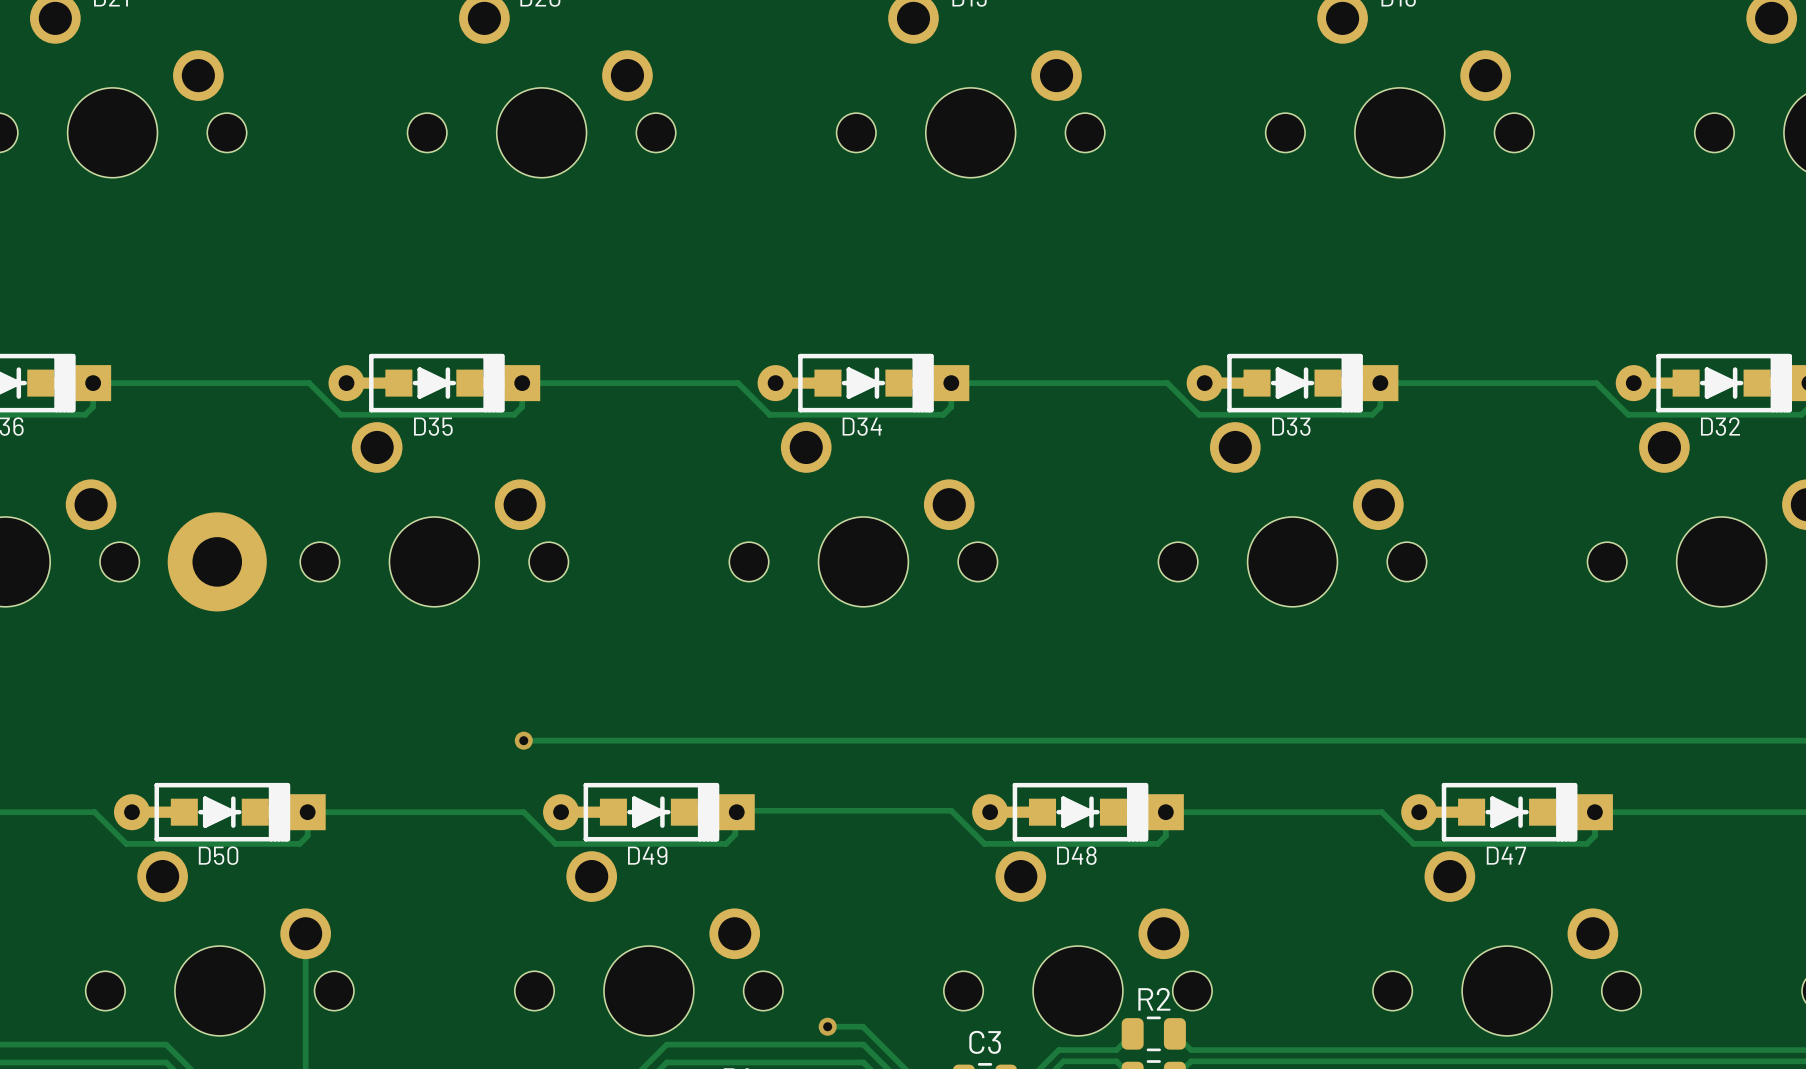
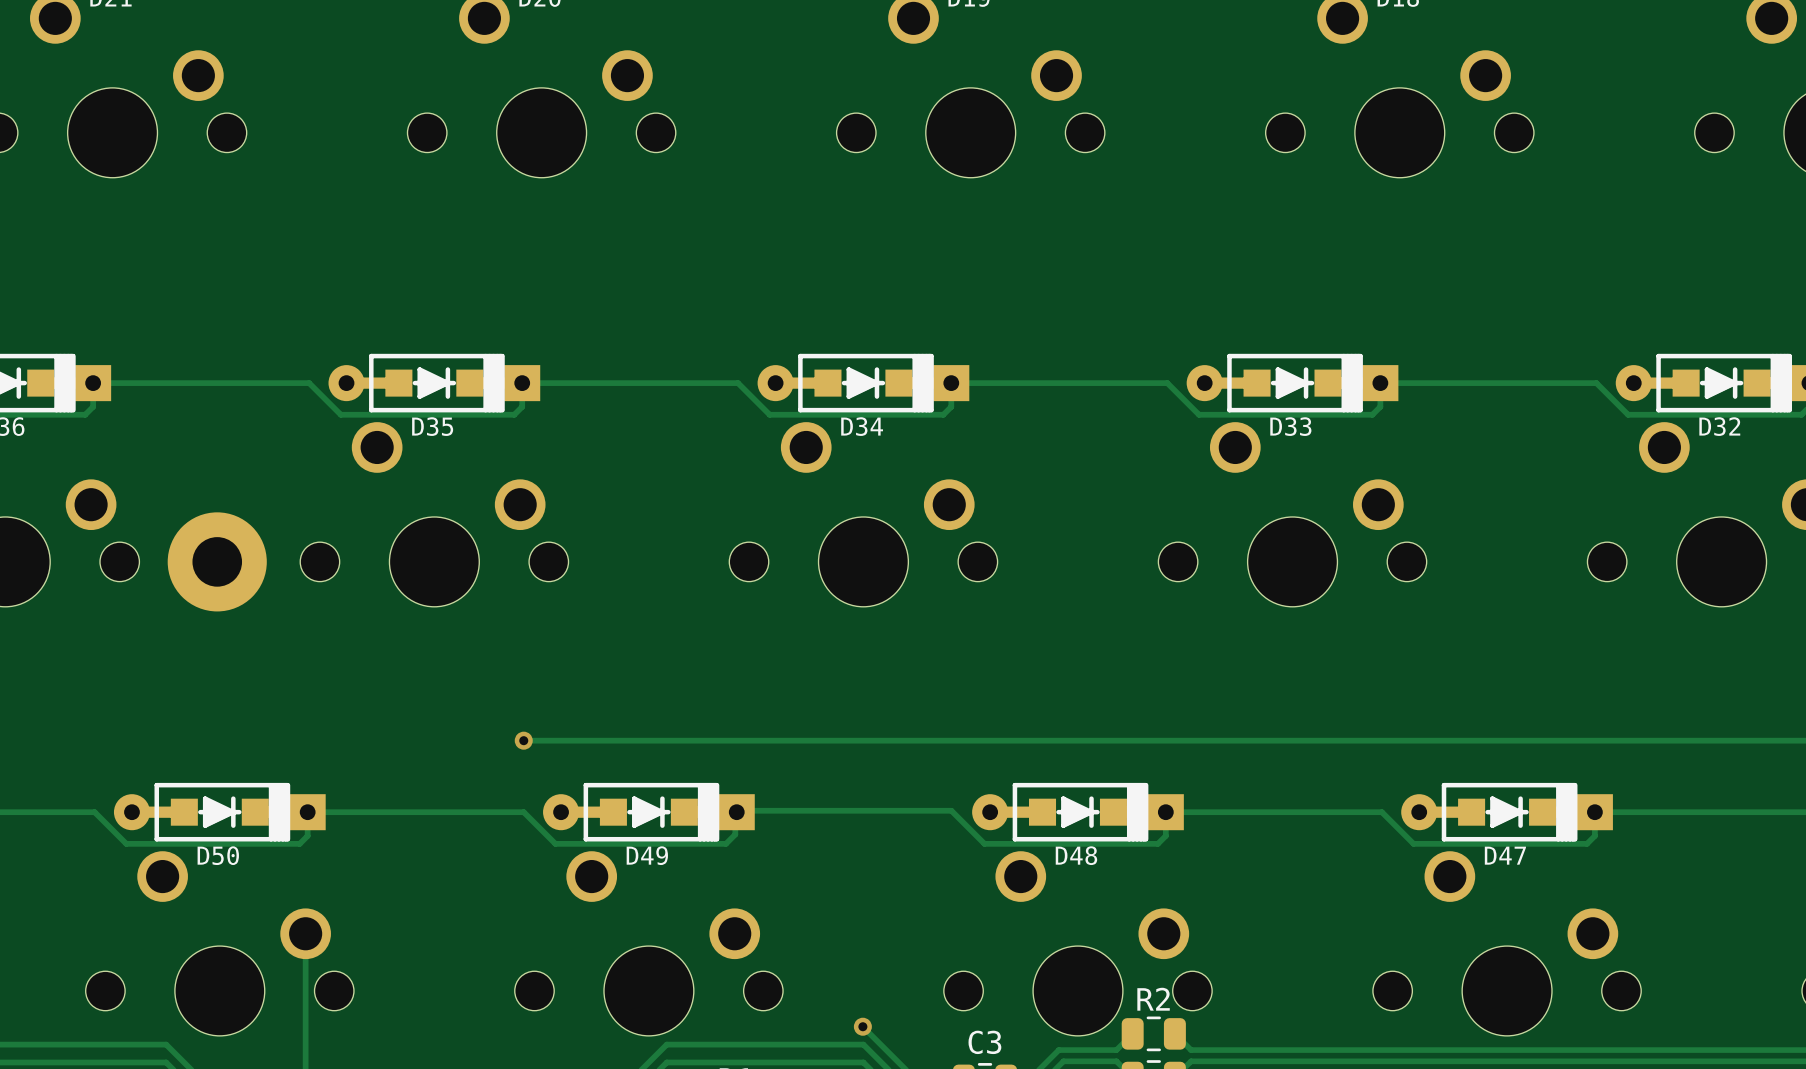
via position: (827, 1026) -> (862, 1026)
track: (862, 1026) (827, 1026) -> none

